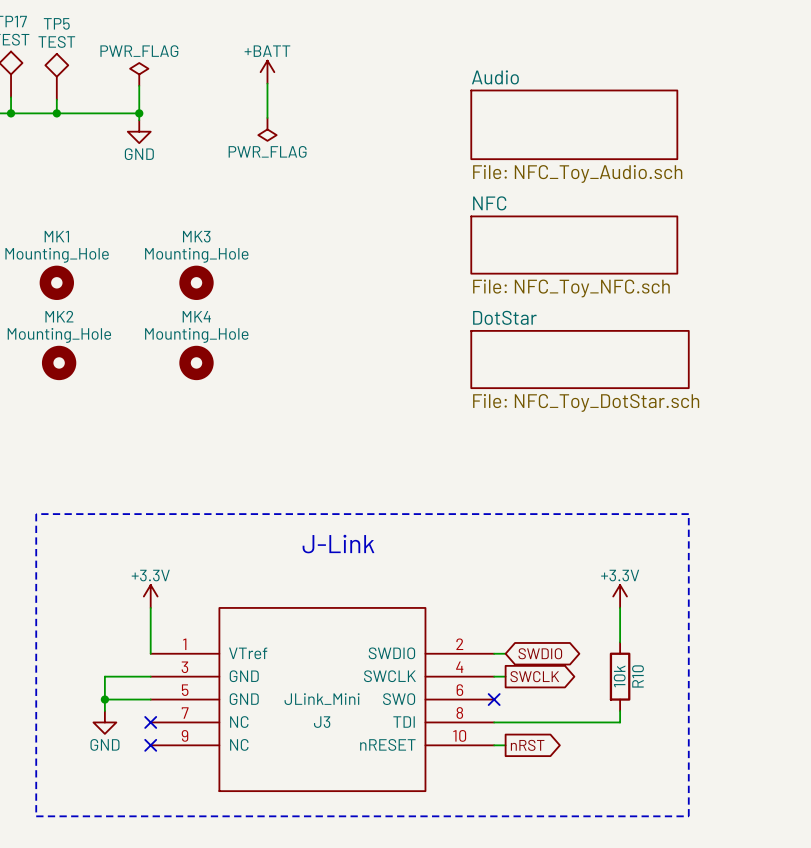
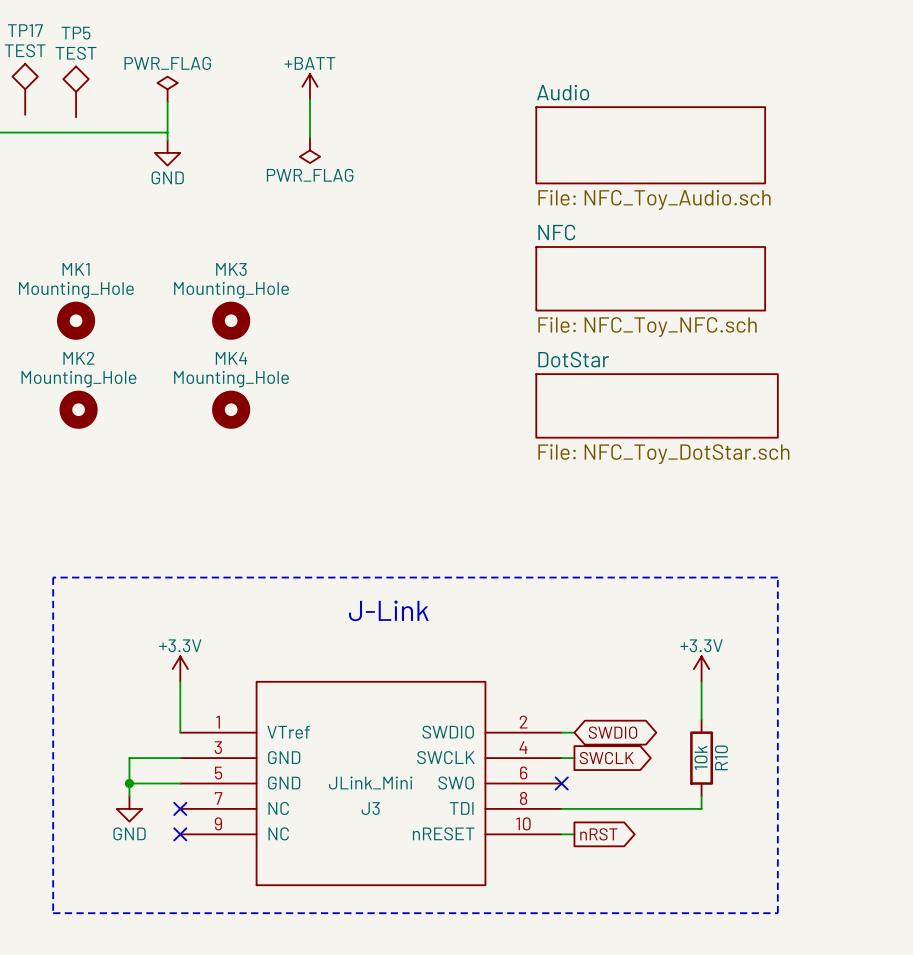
wire: (11, 97) (11, 113) -> none
wire: (56, 99) (56, 113) -> none
junction: (11, 113) -> none
junction: (56, 113) -> none
junction: (139, 113) -> none

